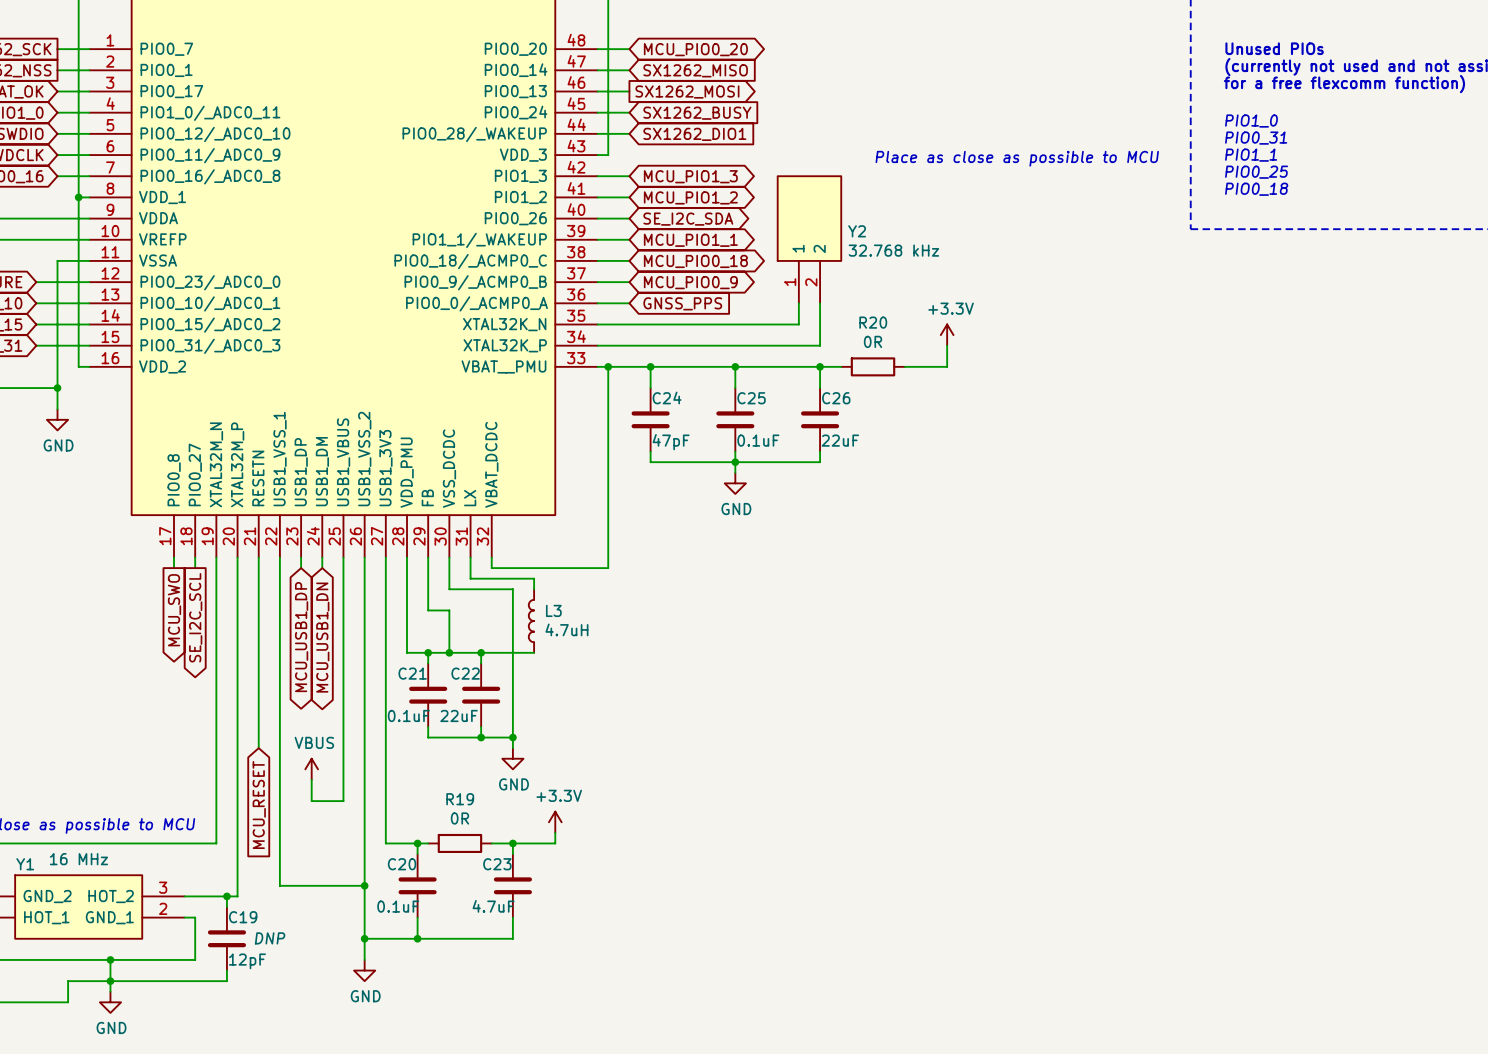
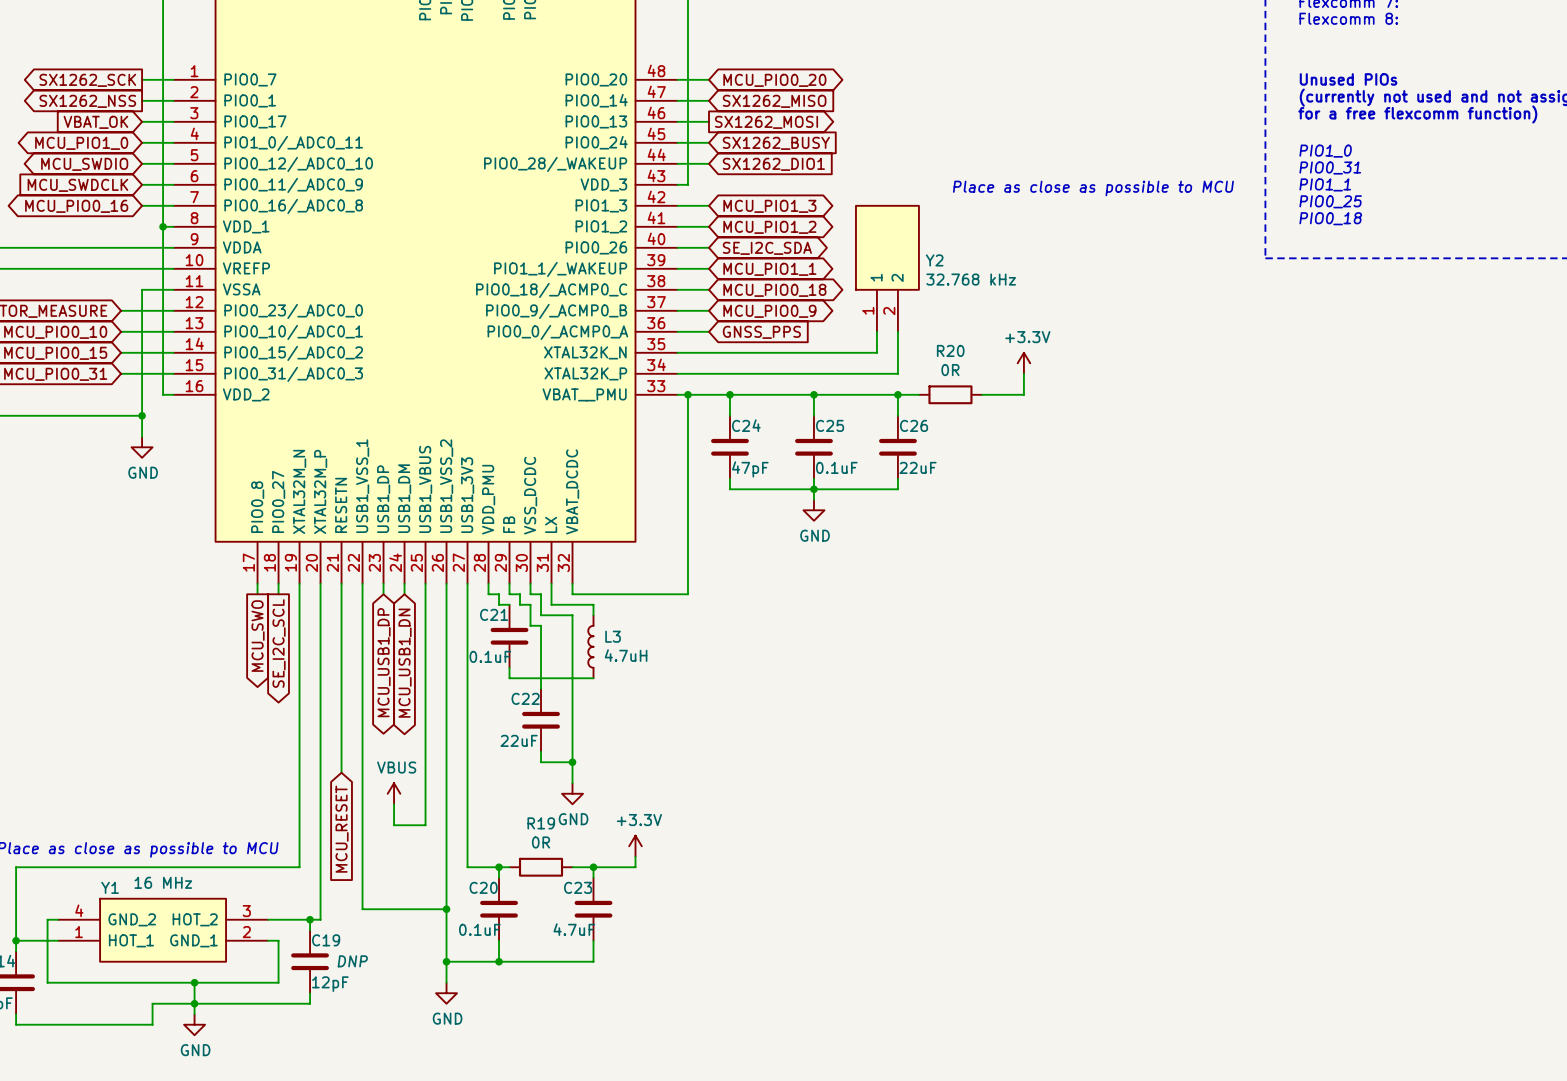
wire: (407, 568) (407, 652) (428, 652) (428, 663) -> (488, 594) (499, 594) (499, 604) (509, 604)
wire: (428, 568) (428, 610) (449, 610) (449, 652) -> (509, 594) (520, 594) (520, 604) (530, 604)
wire: (449, 568) (449, 578) -> (530, 594) (541, 594) (541, 615)
wire: (512, 578) (534, 578) (534, 589) -> (593, 604) (593, 615)
wire: (449, 589) (459, 589) -> (530, 615) (530, 625) (541, 625) (541, 688)
wire: (491, 589) (512, 589) (512, 748) -> (572, 615) (572, 783)
L3 position: (531, 621) -> (590, 646)
junction: (428, 652) -> none
junction: (449, 652) -> none
wire: (481, 652) (481, 663) -> (509, 667) (509, 678)
junction: (481, 652) -> none
wire: (512, 652) (534, 652) -> none
C21 position: (428, 695) -> (509, 636)
C22 position: (481, 695) -> (541, 720)
wire: (428, 726) (428, 737) (459, 737) -> (541, 751) (541, 762)
wire: (481, 726) (481, 737) -> none
junction: (481, 737) -> none
wire: (491, 737) (512, 737) -> none
junction: none -> (572, 762)
junction: (512, 737) -> none
power symbol position: GND (512, 758) -> GND (572, 793)

